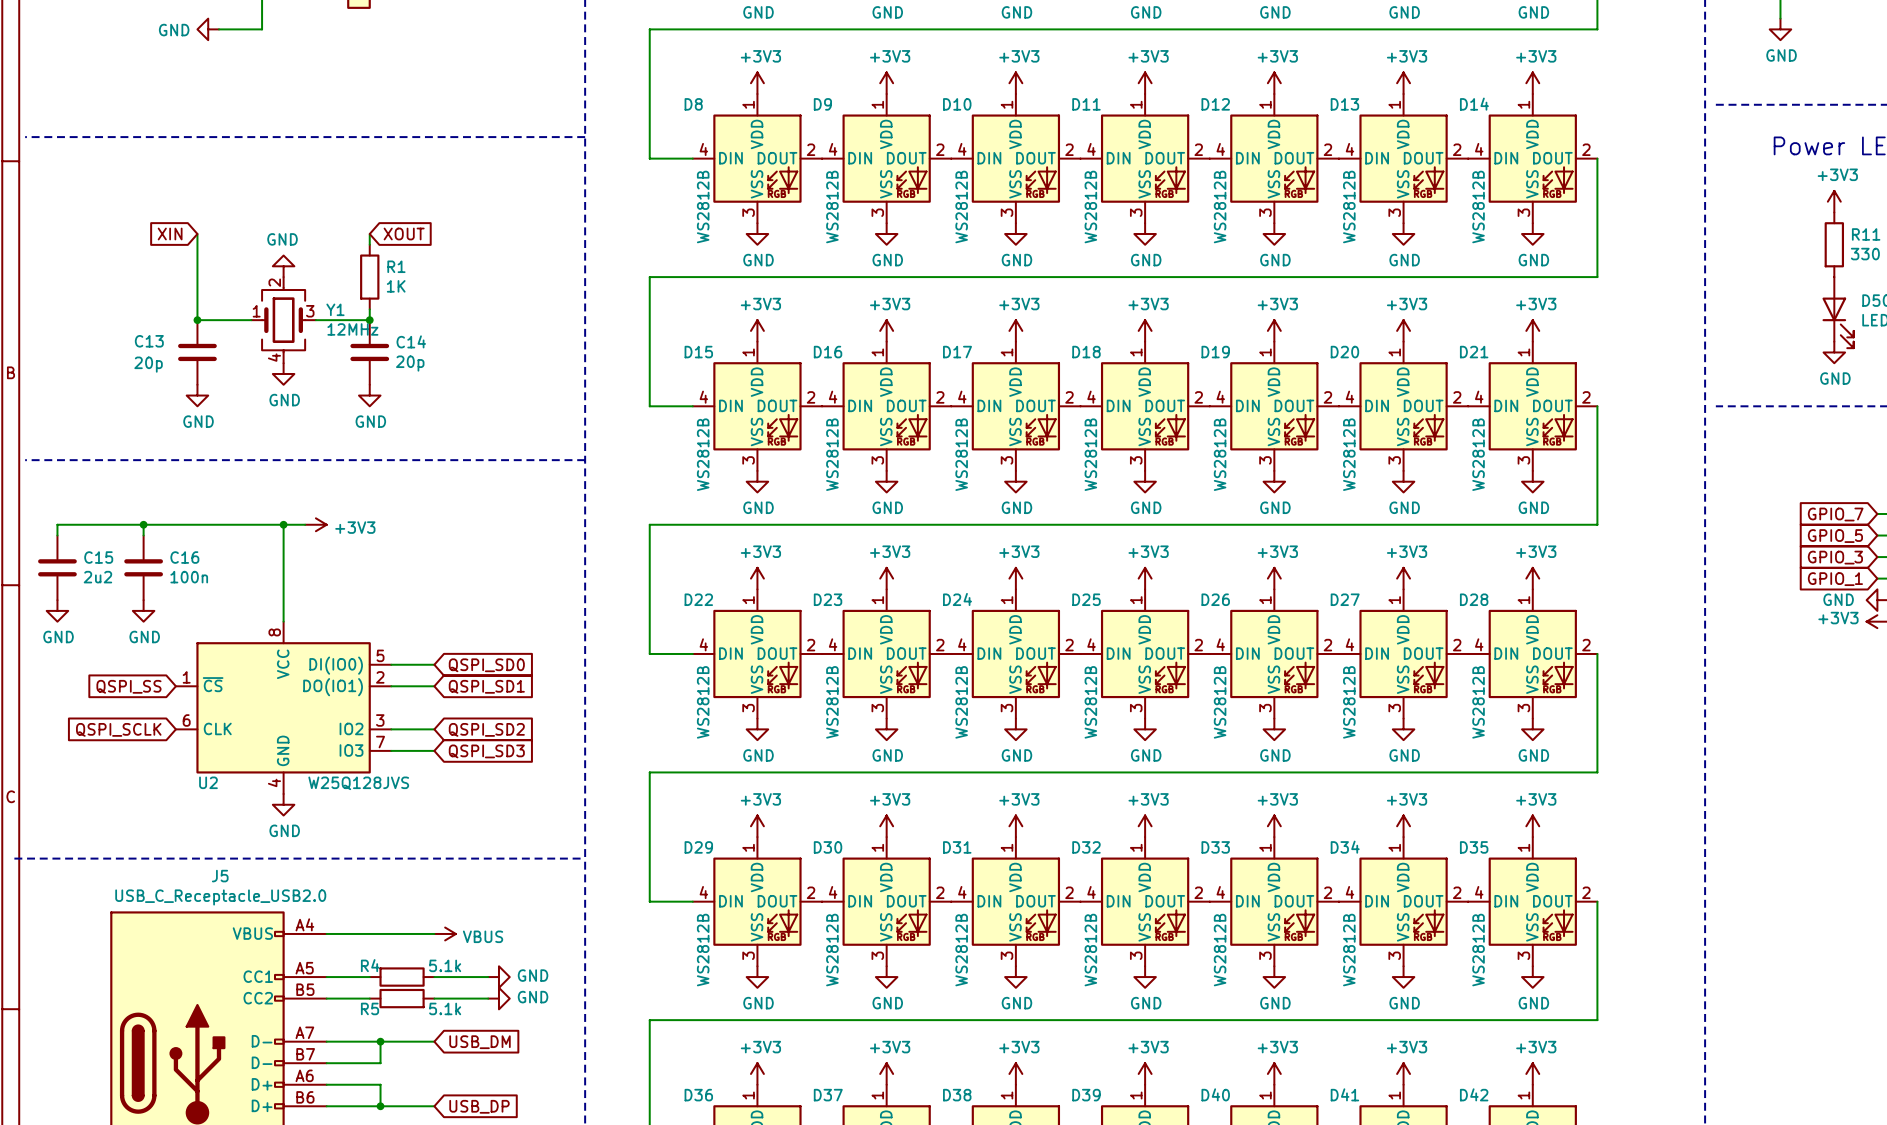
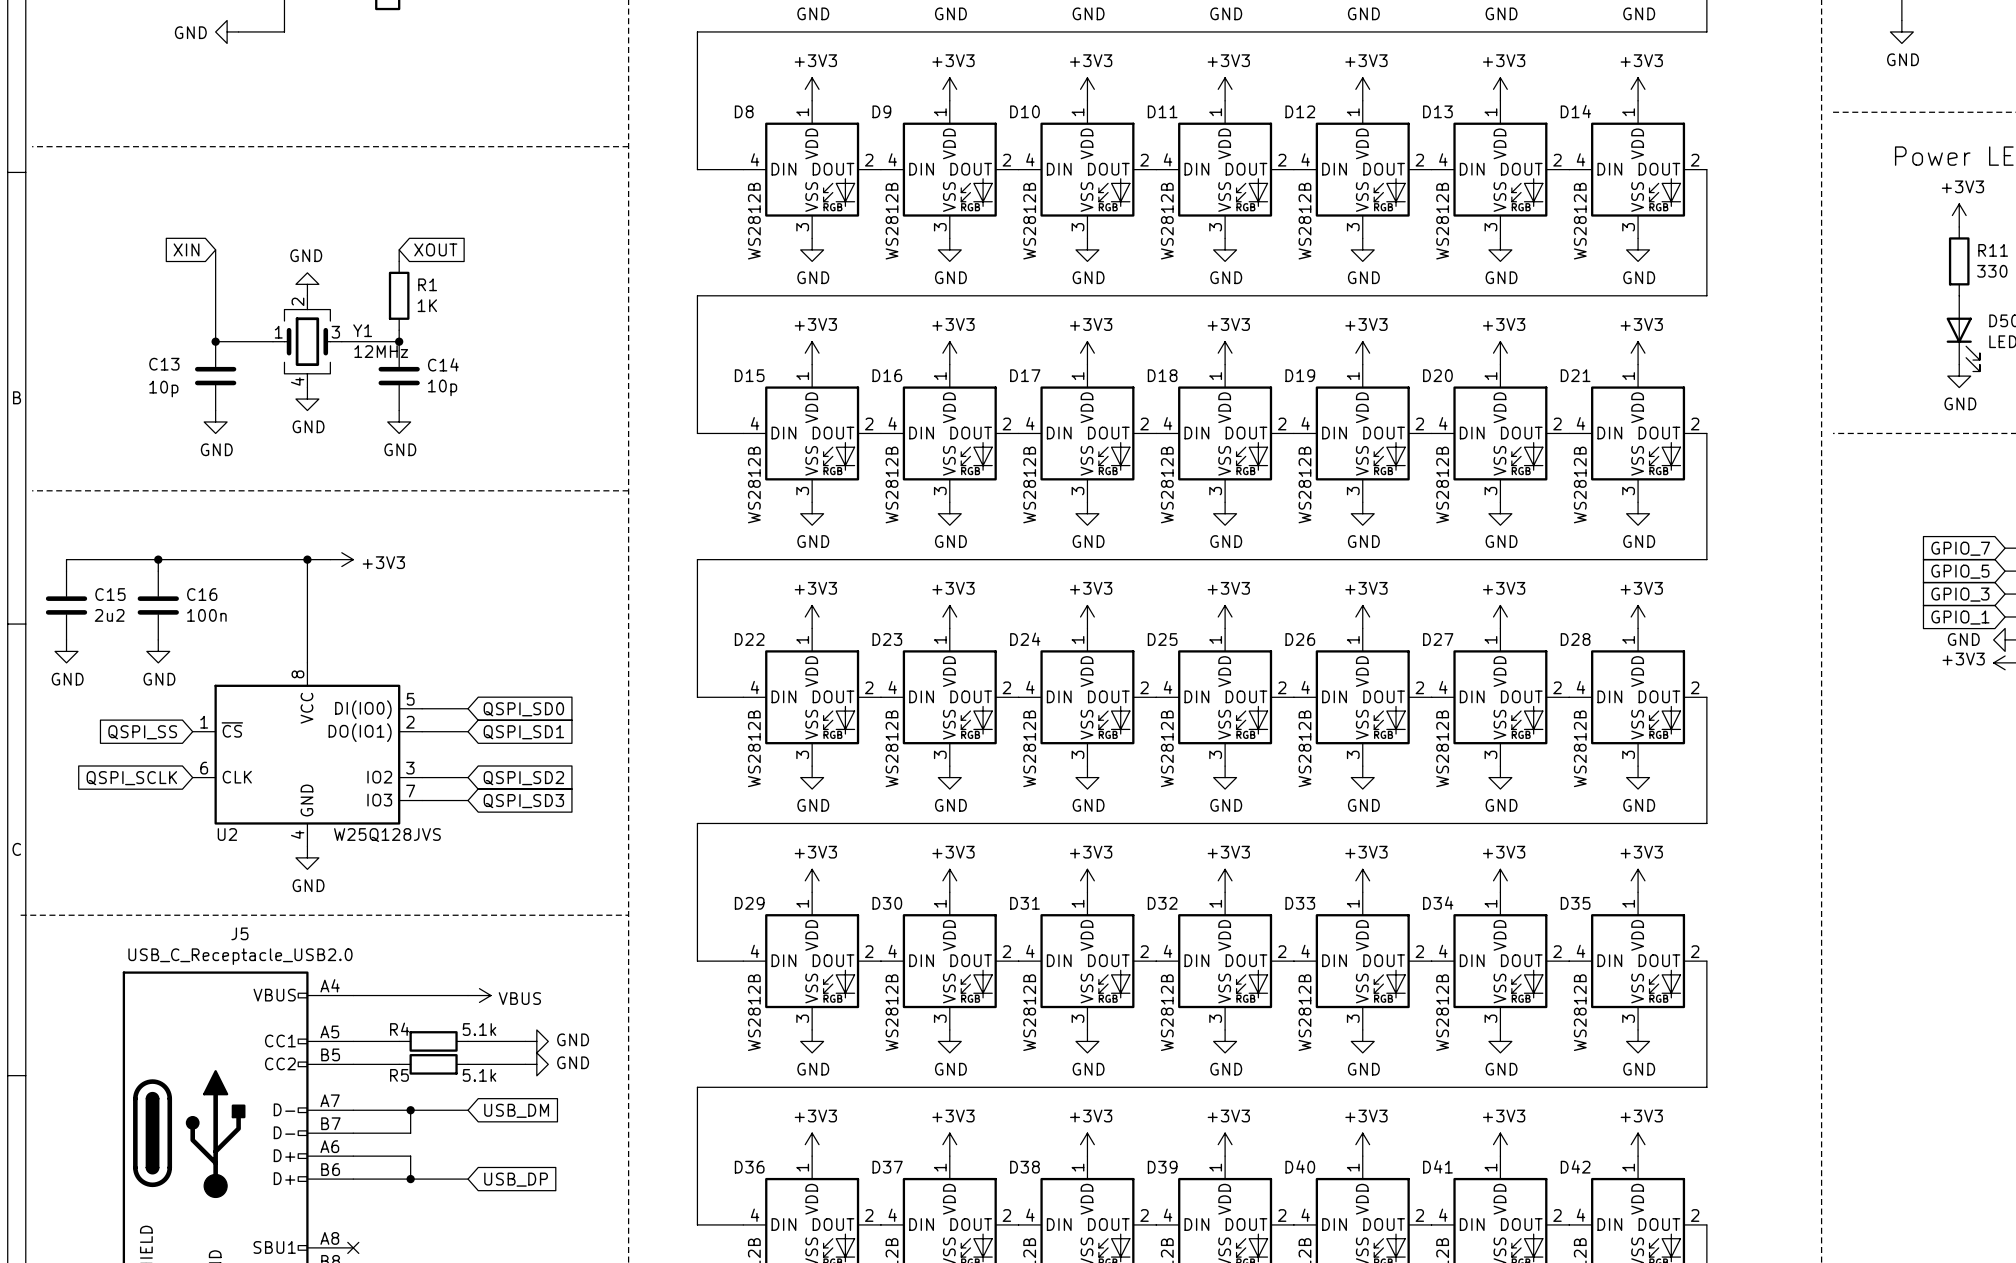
C14 value: 20p (410, 363) -> 10p (442, 387)
C13 value: 20p (148, 364) -> 10p (163, 389)

